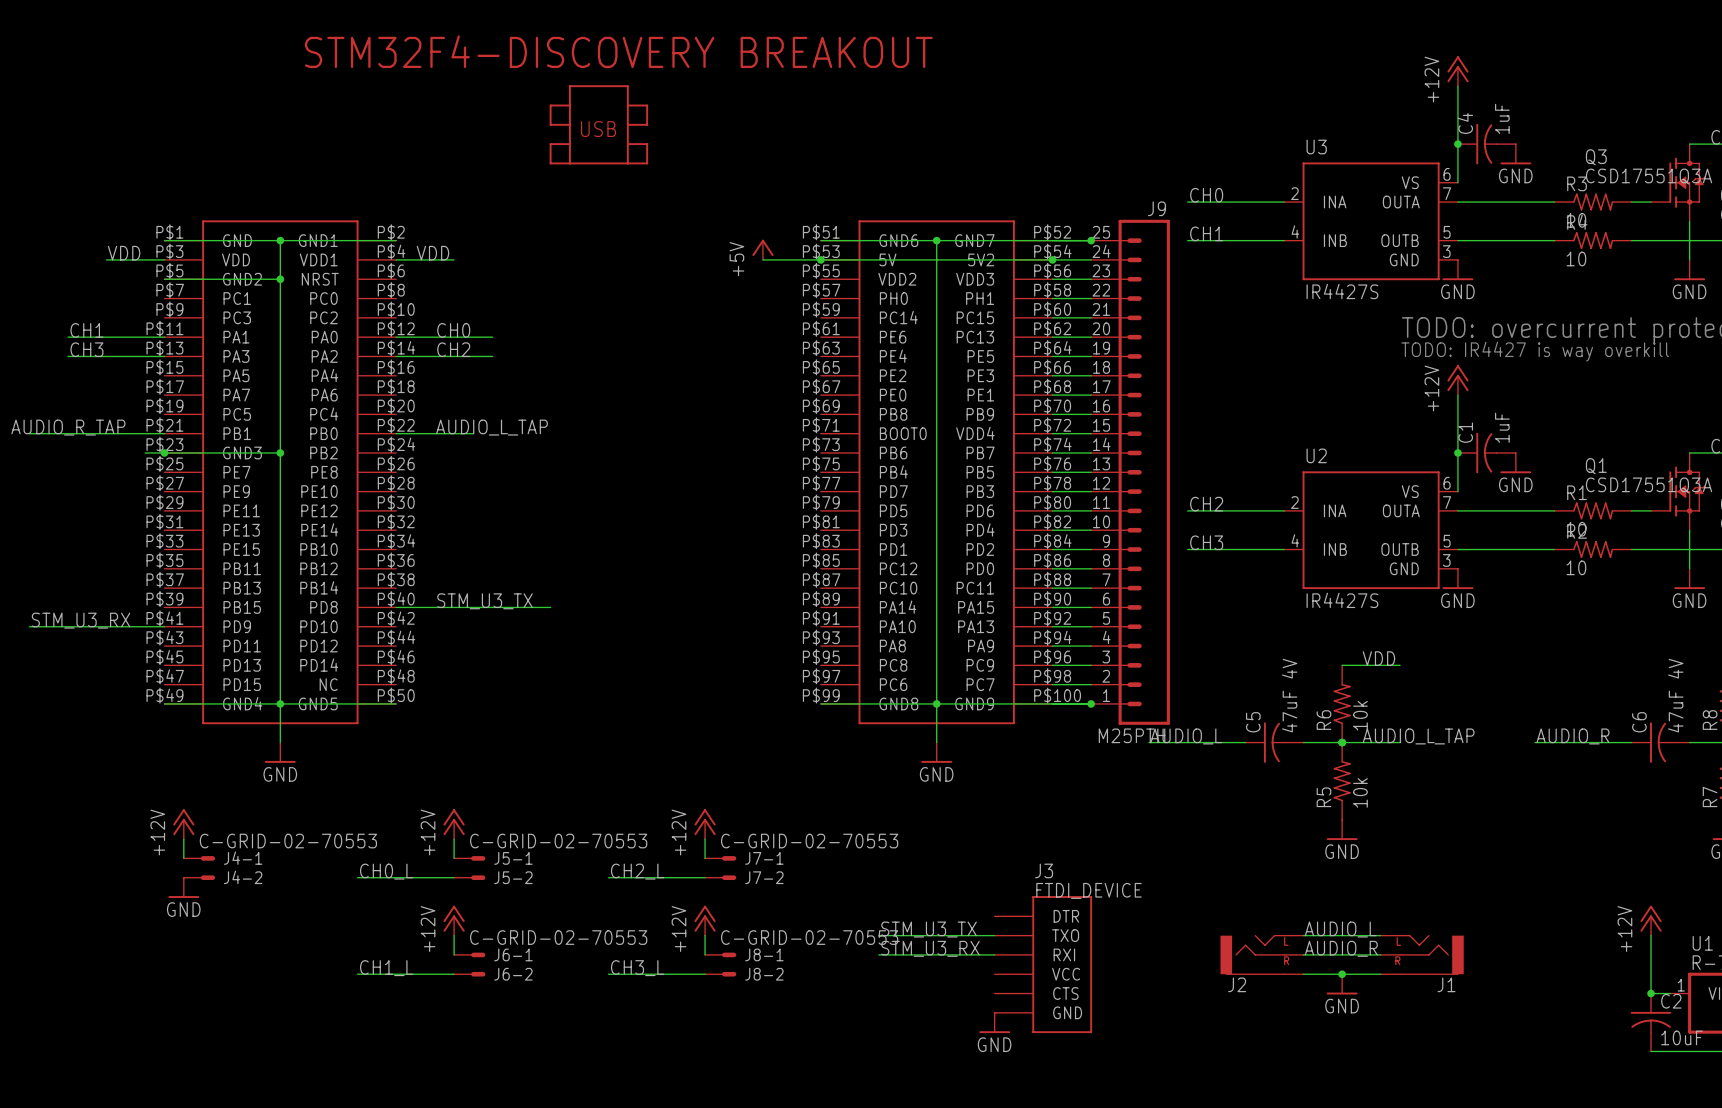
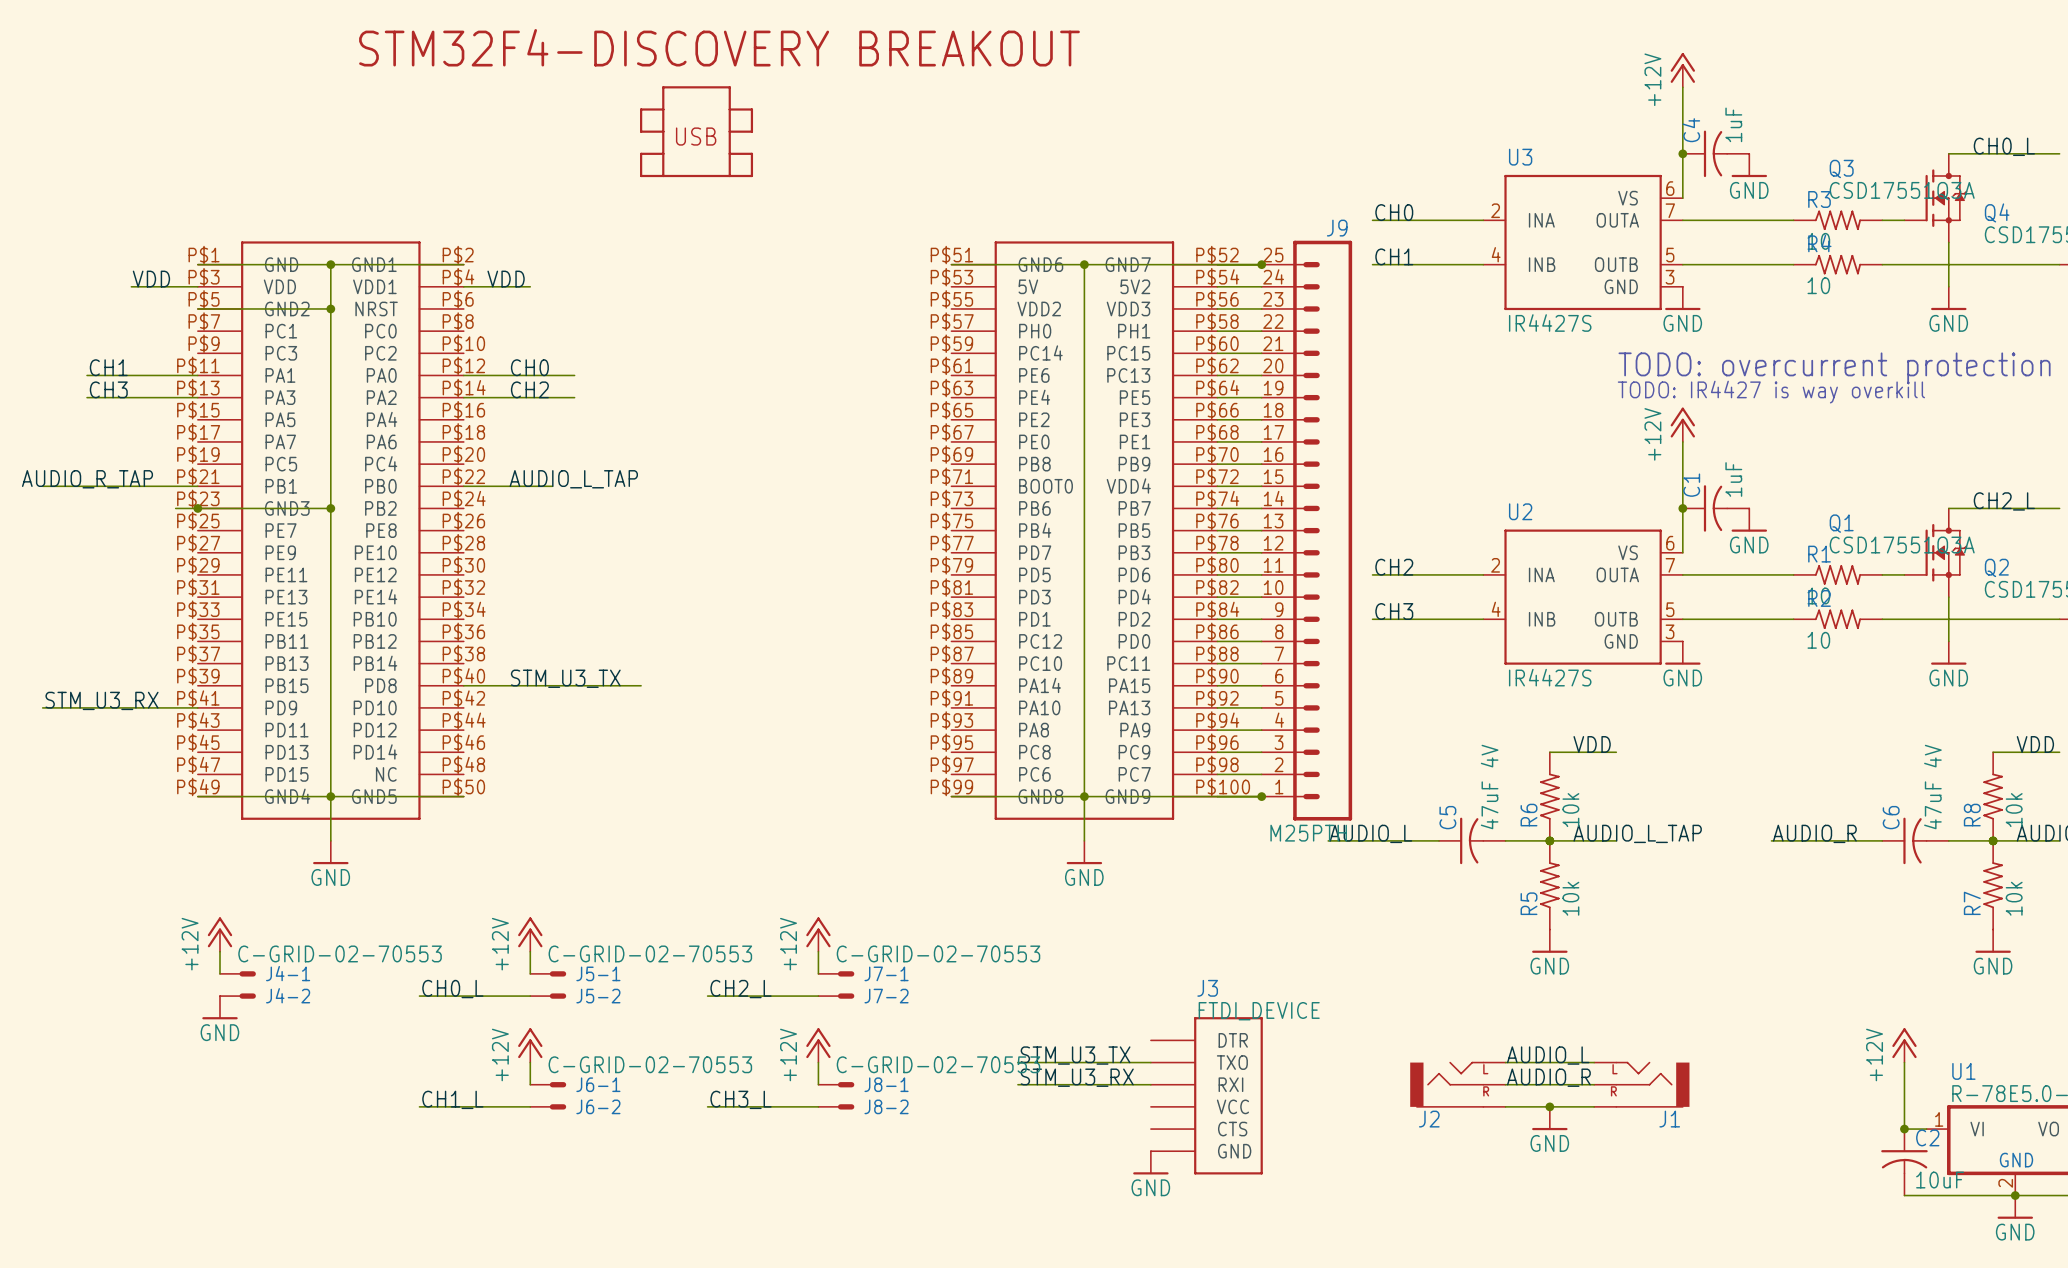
power symbol: +5V (762, 249) -> none
wire: (762, 259) (1052, 259) -> none
junction: (820, 259) -> none
junction: (1052, 259) -> none

